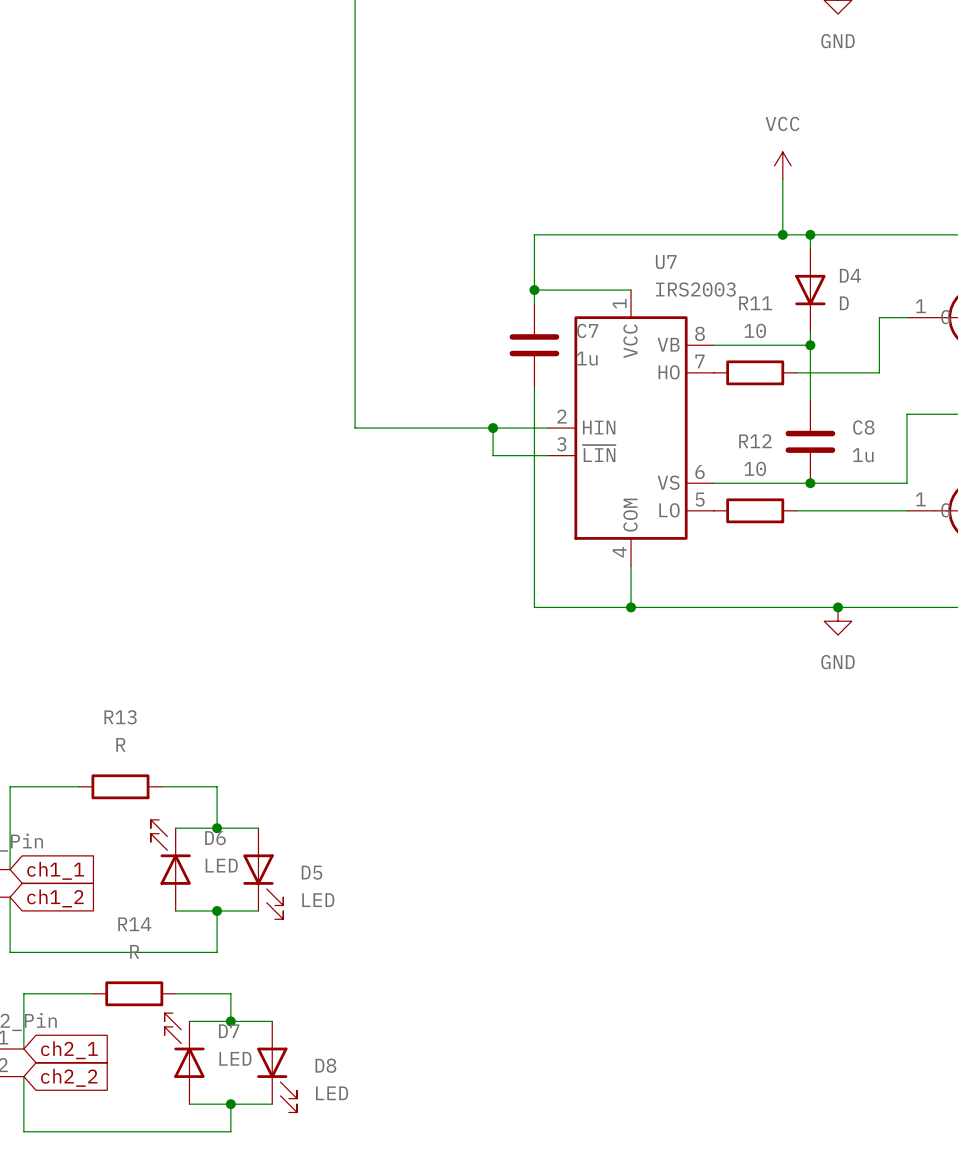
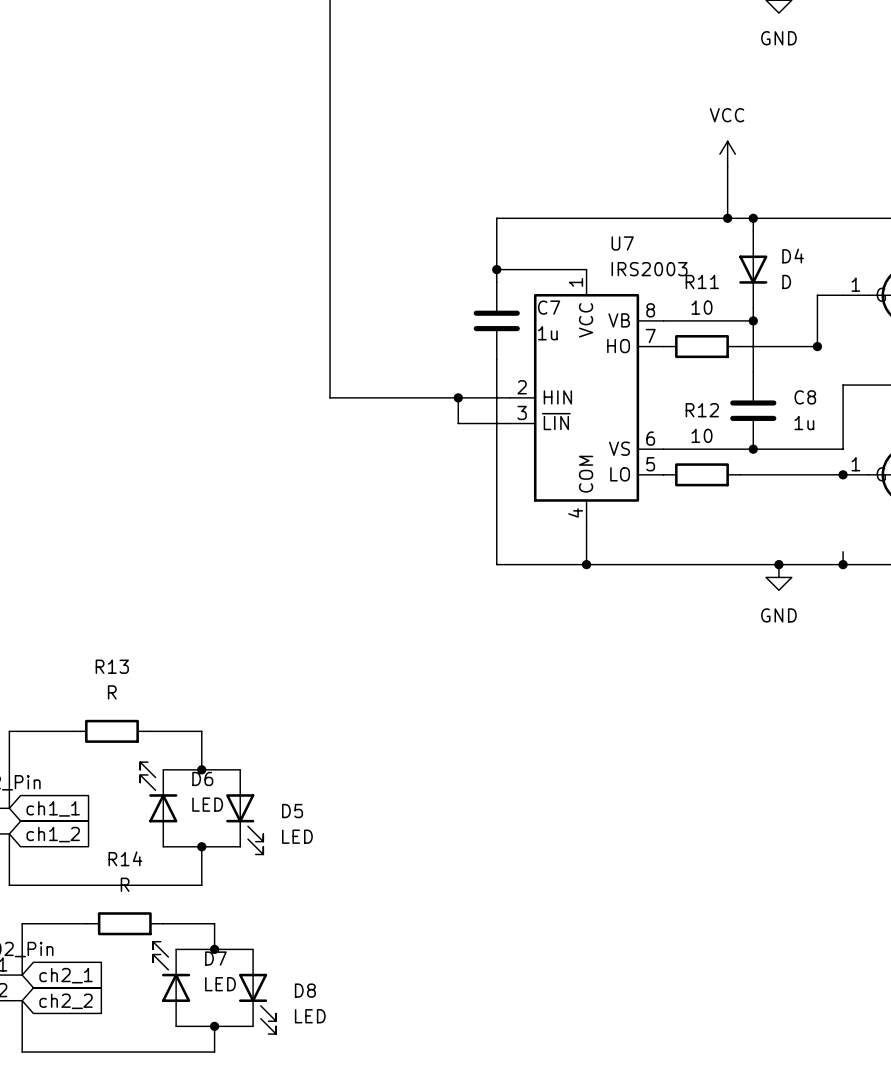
junction: none -> (817, 346)
junction: none -> (843, 474)
wire: none -> (843, 551) (843, 564)
junction: none -> (843, 564)

